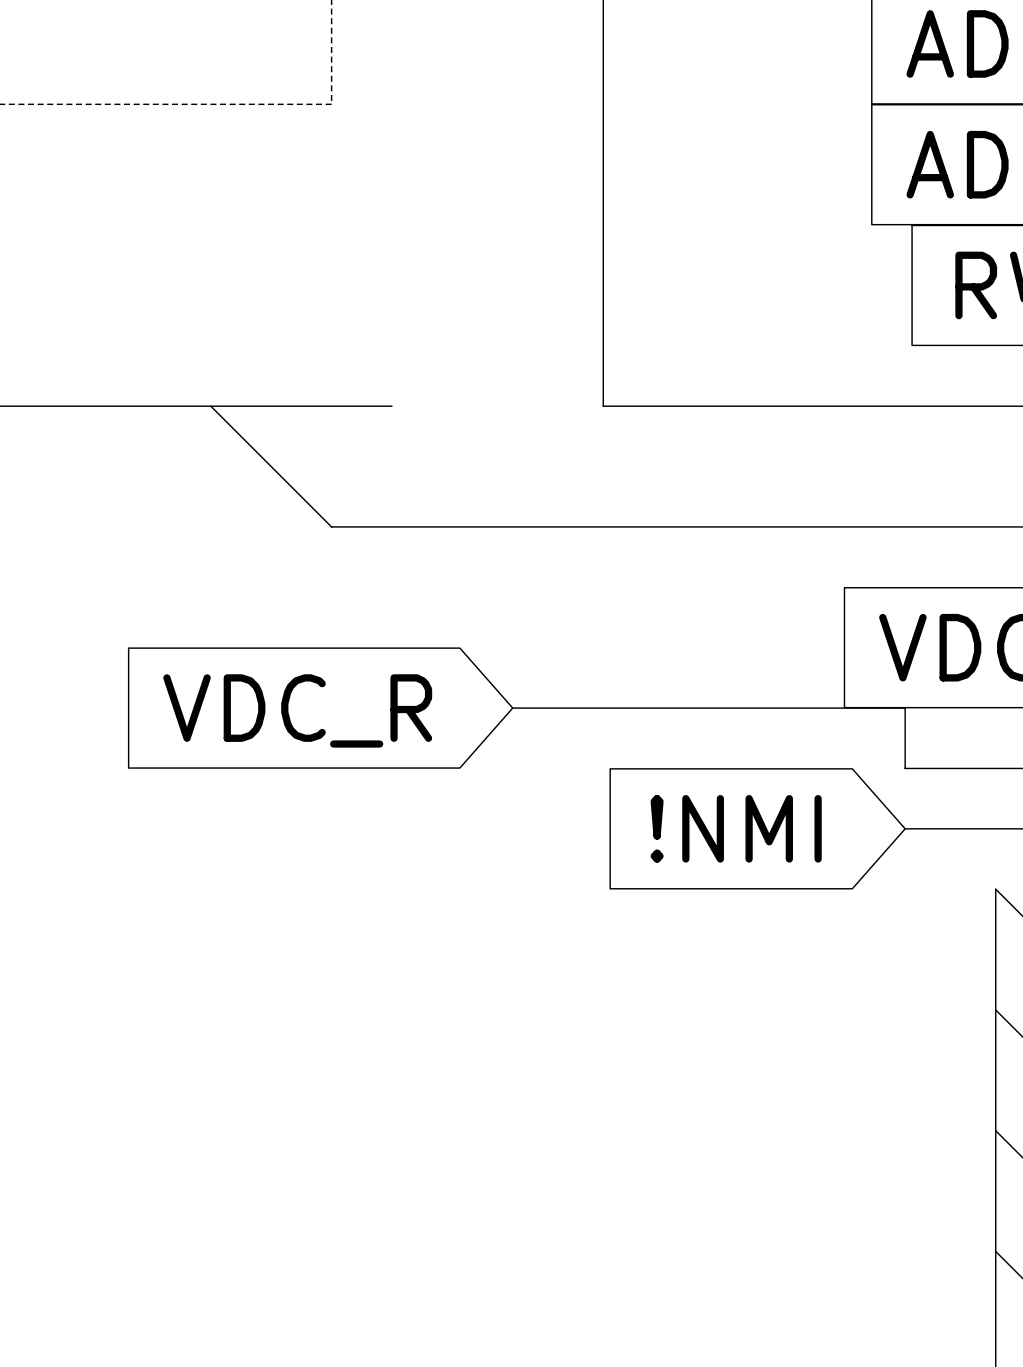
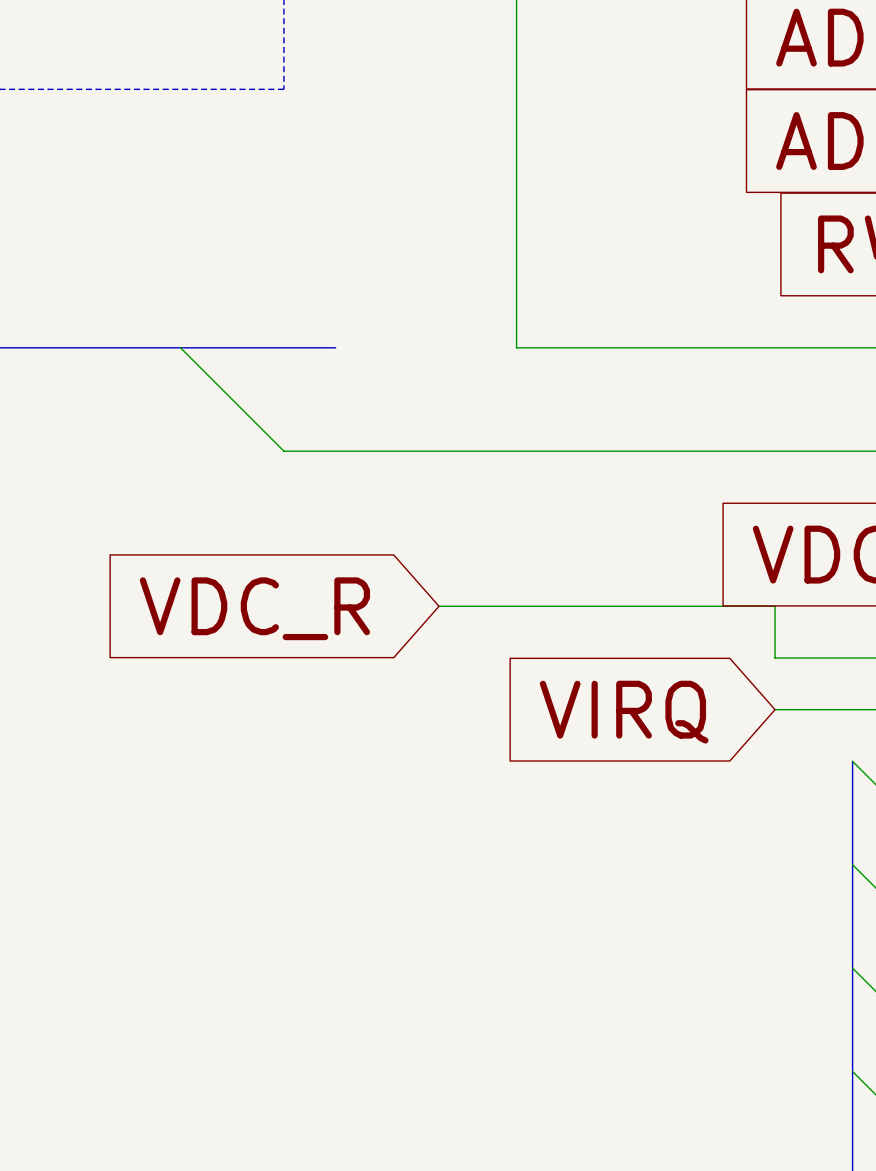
global label: !NMI (736, 828) -> VIRQ (624, 712)

